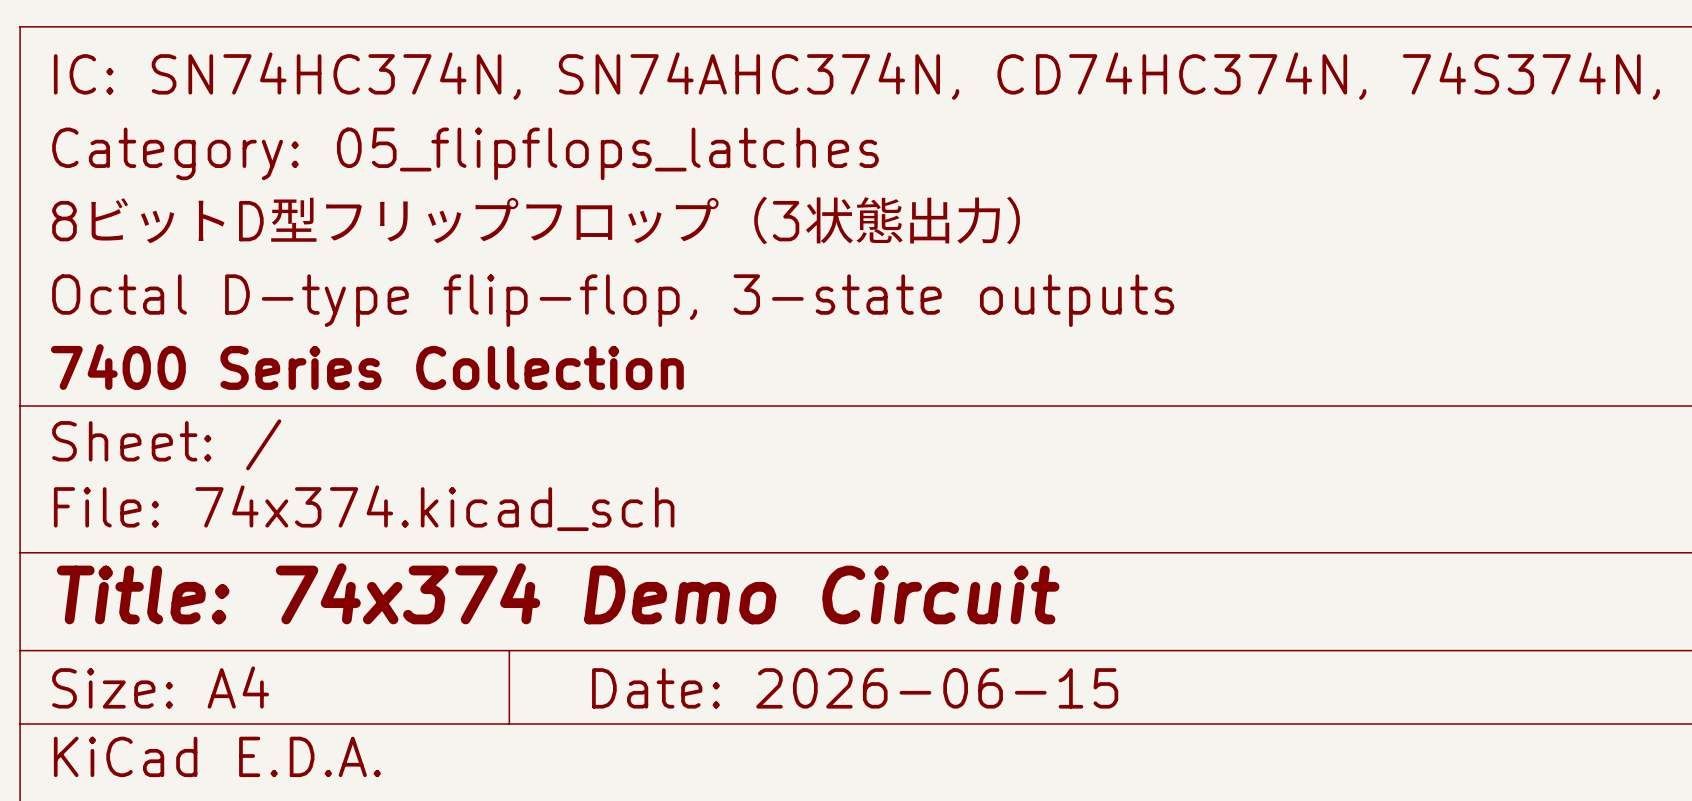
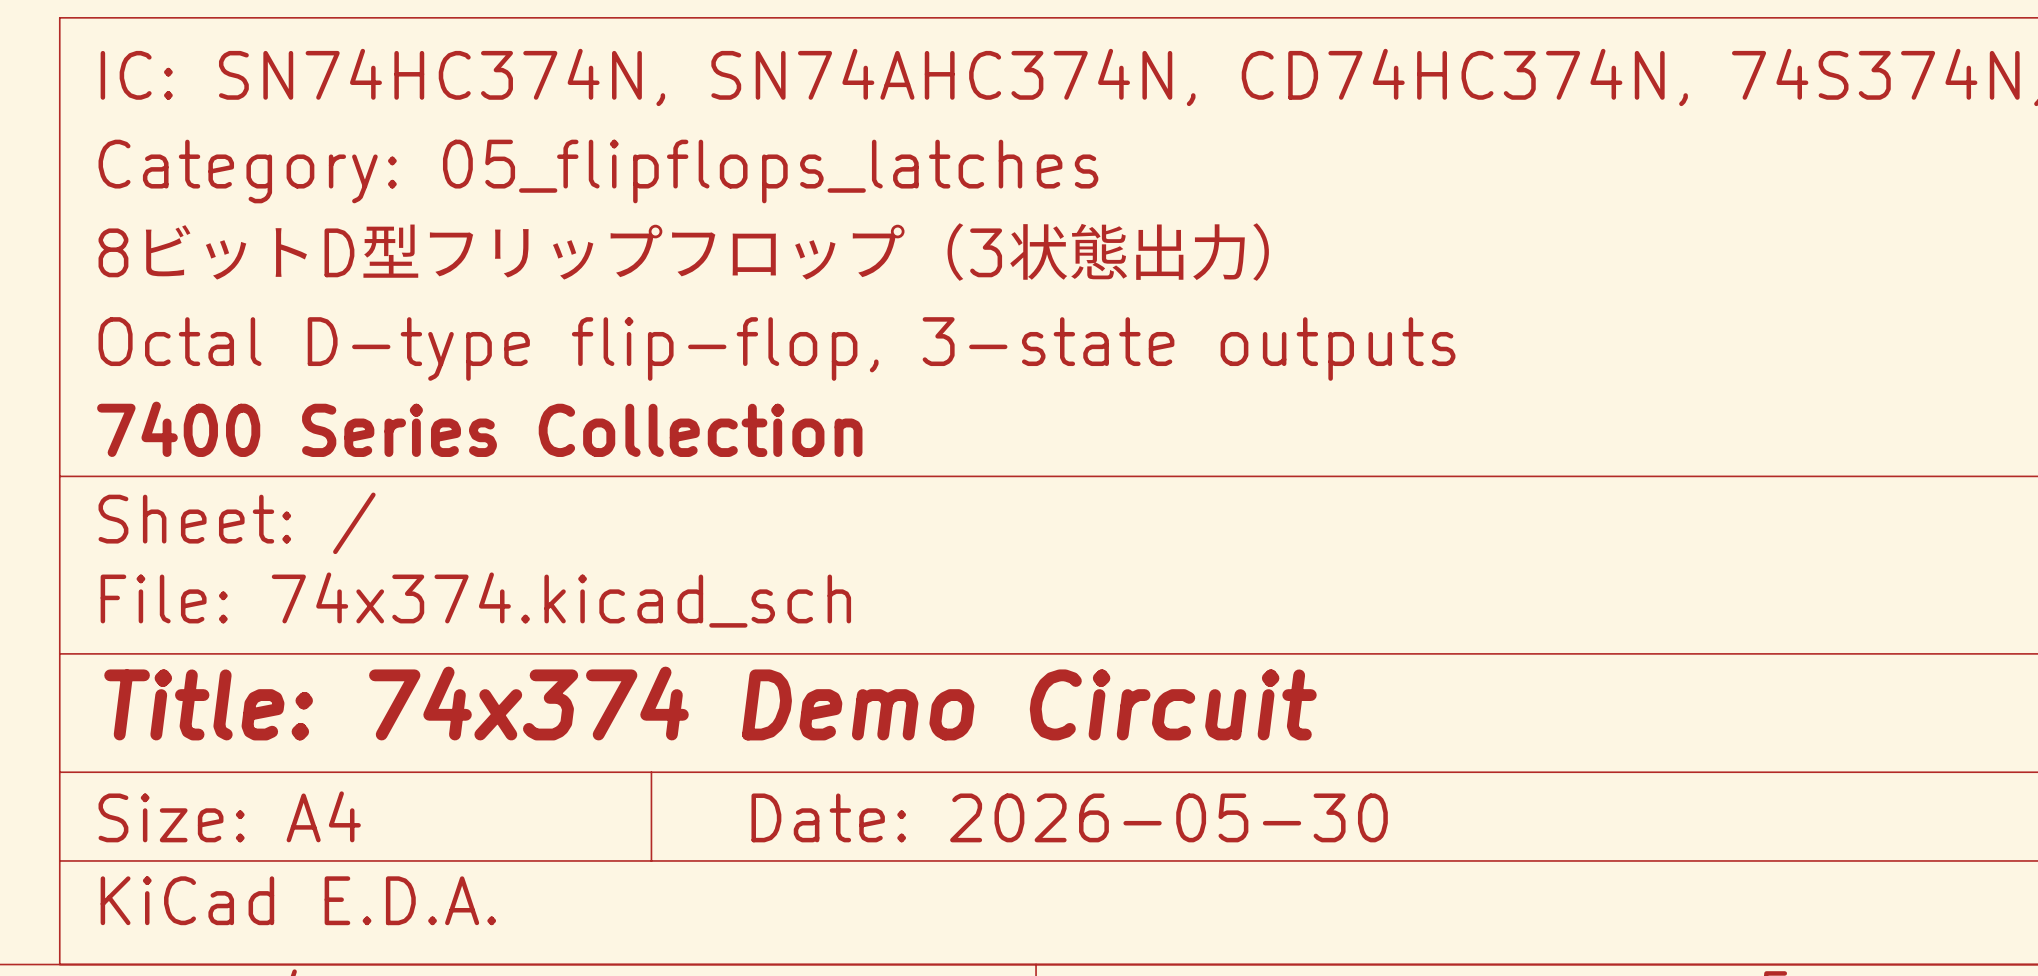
title block: Date: 2026-06-15 (855, 688) -> Date: 2026-05-30 (1069, 817)

